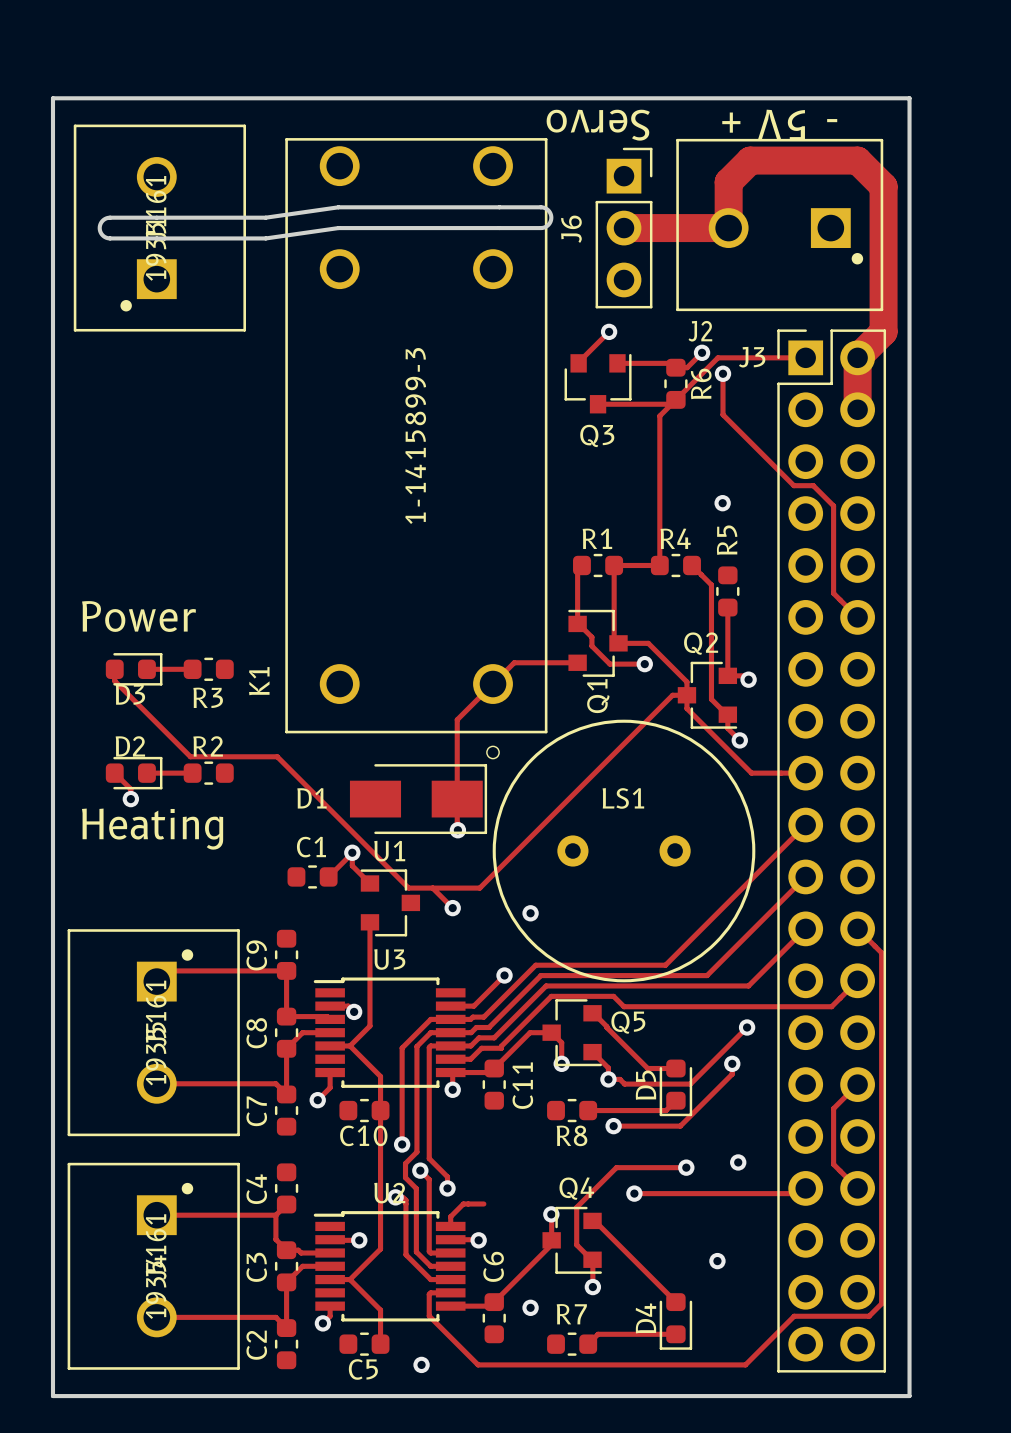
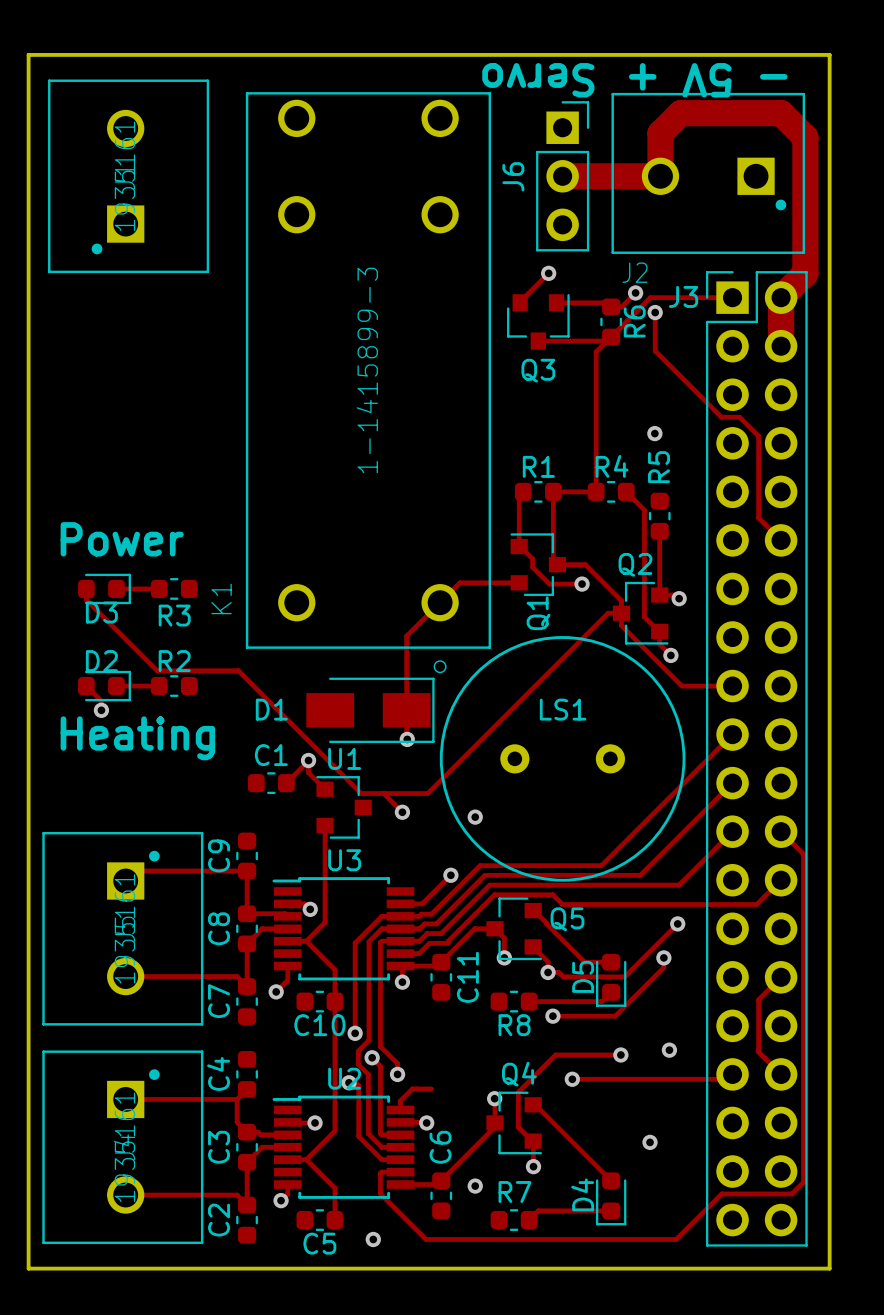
board edge: (338, 207) (540, 207) (548, 210) (551, 217) (548, 225) (542, 227) (338, 228) (265, 238) (110, 238) (103, 236) (99, 229) (101, 221) (108, 217) (265, 217) (338, 207) -> none

